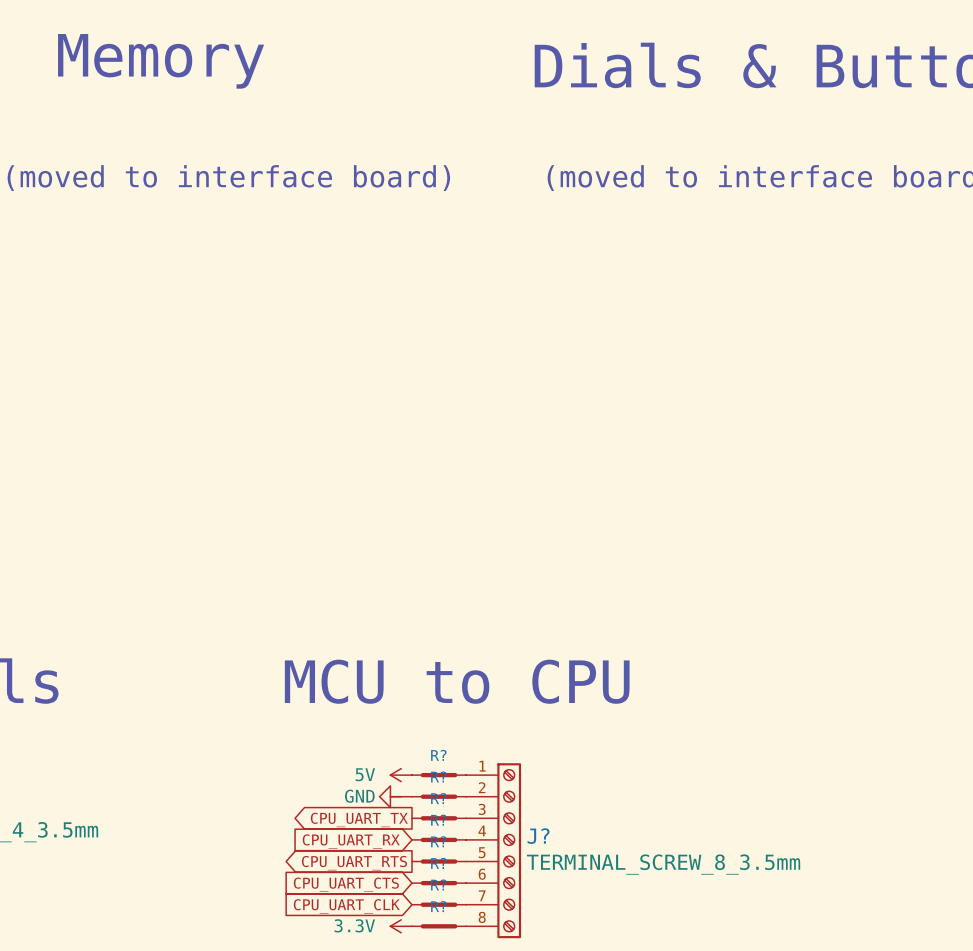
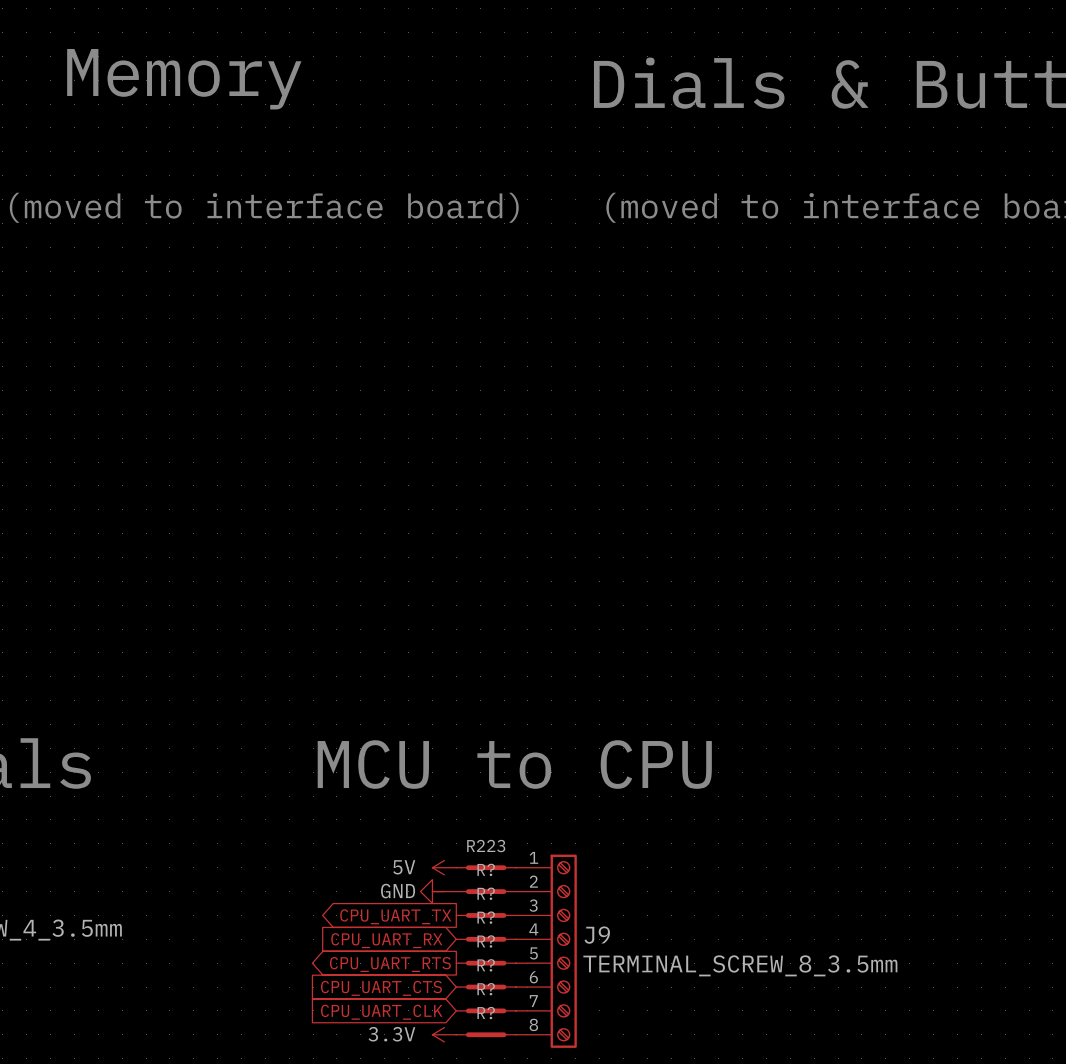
R? name: R? (438, 755) -> R223 (486, 846)
J? name: J? (538, 836) -> J9 (597, 935)

